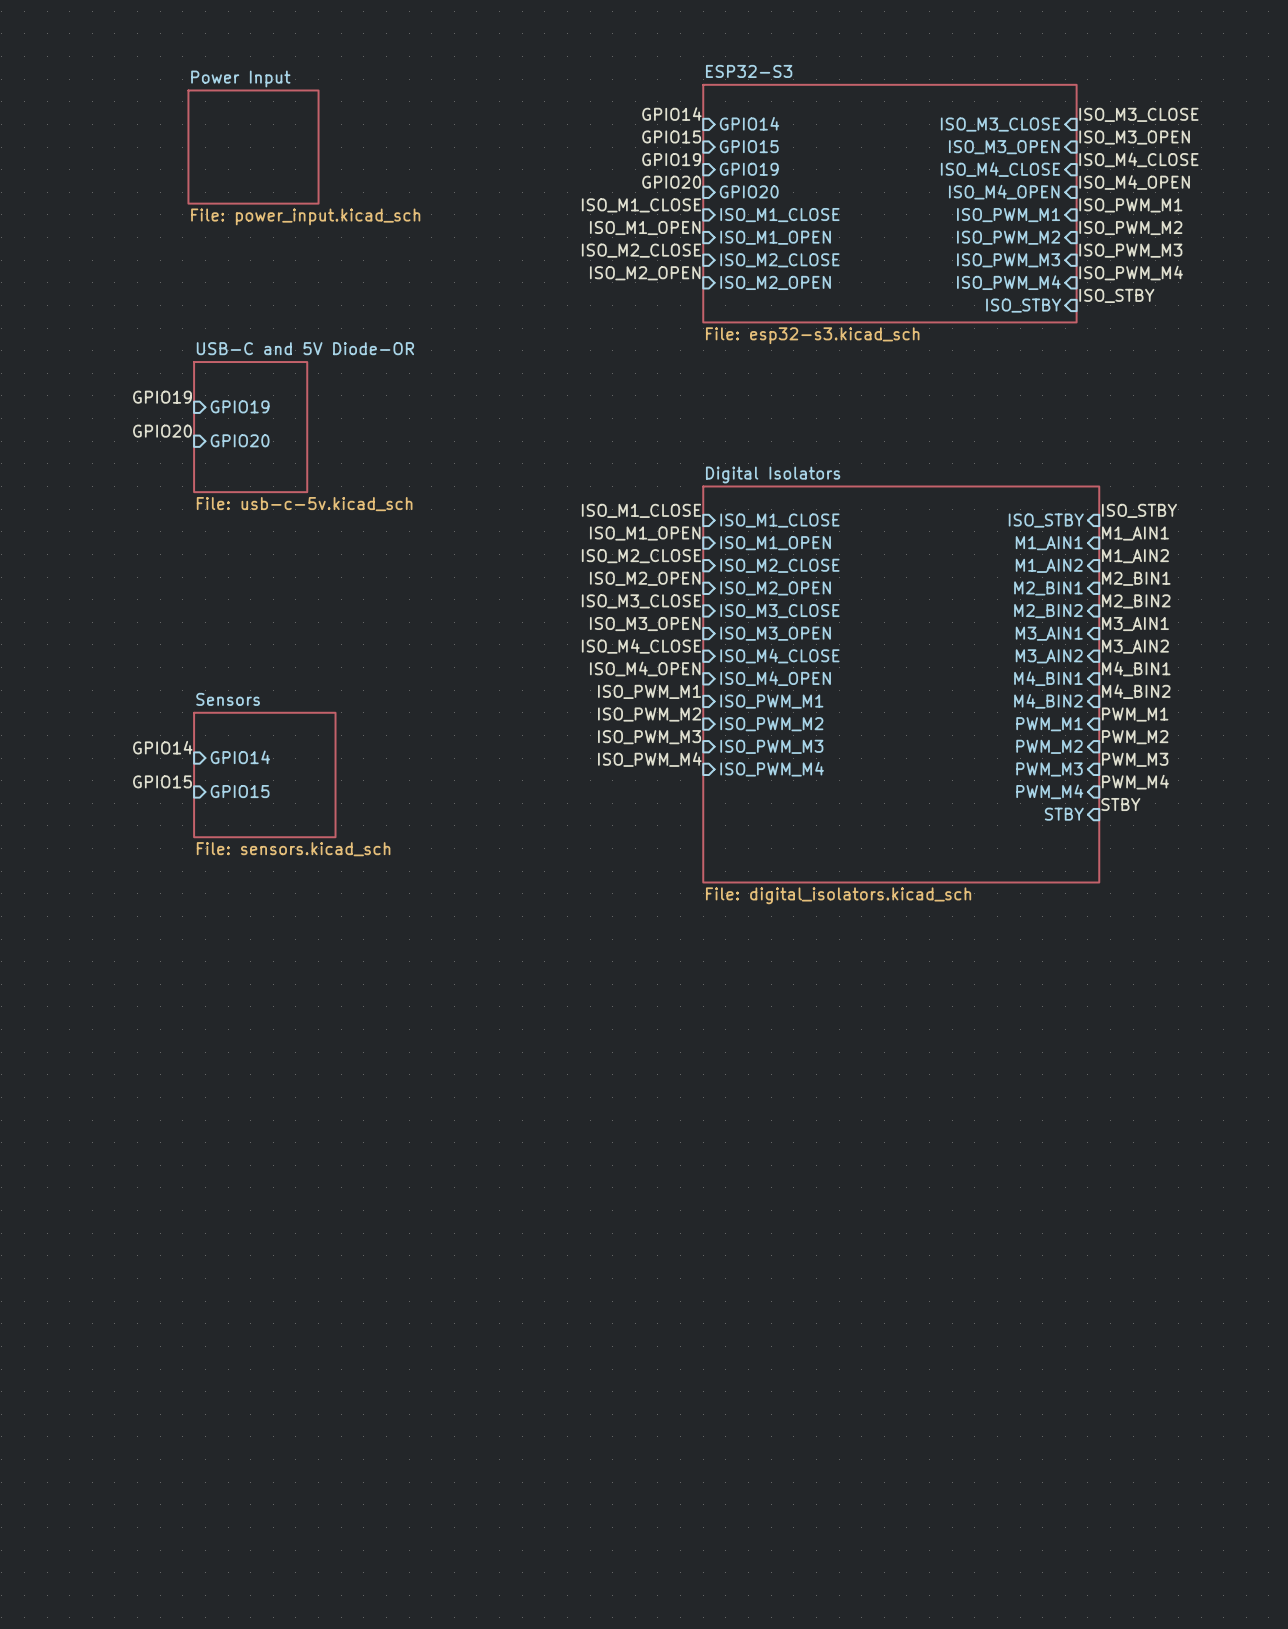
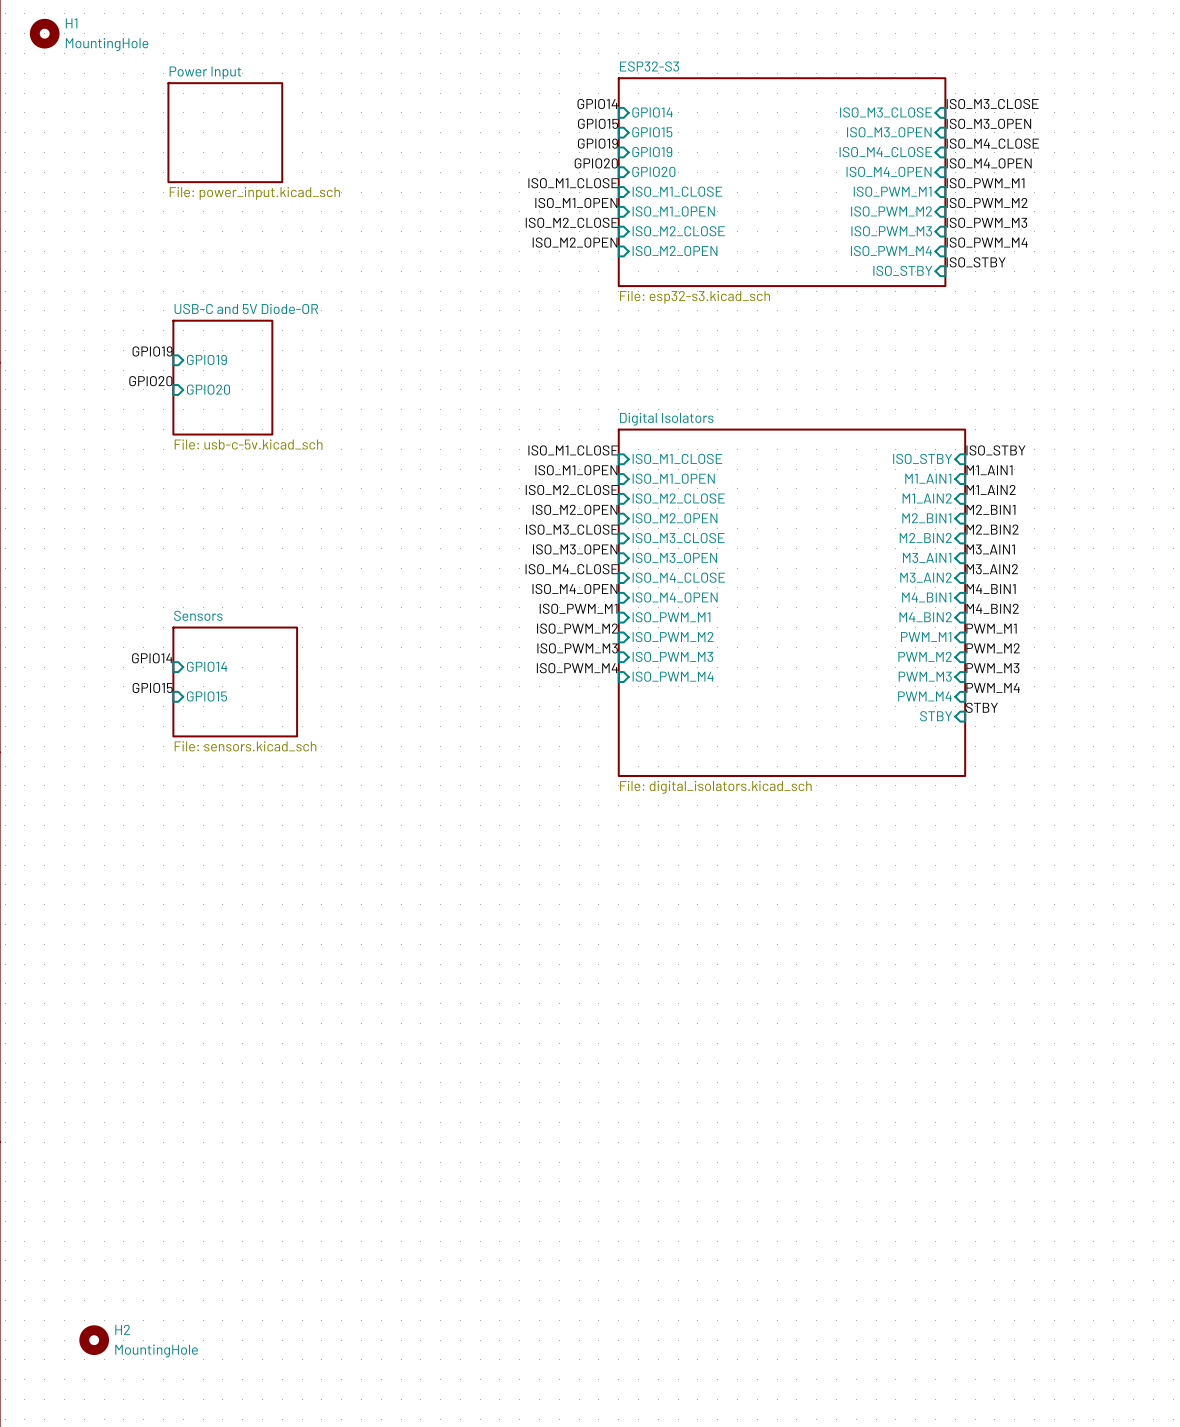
H1: none -> MountingHole (44, 33)
H2: none -> MountingHole (94, 1340)

